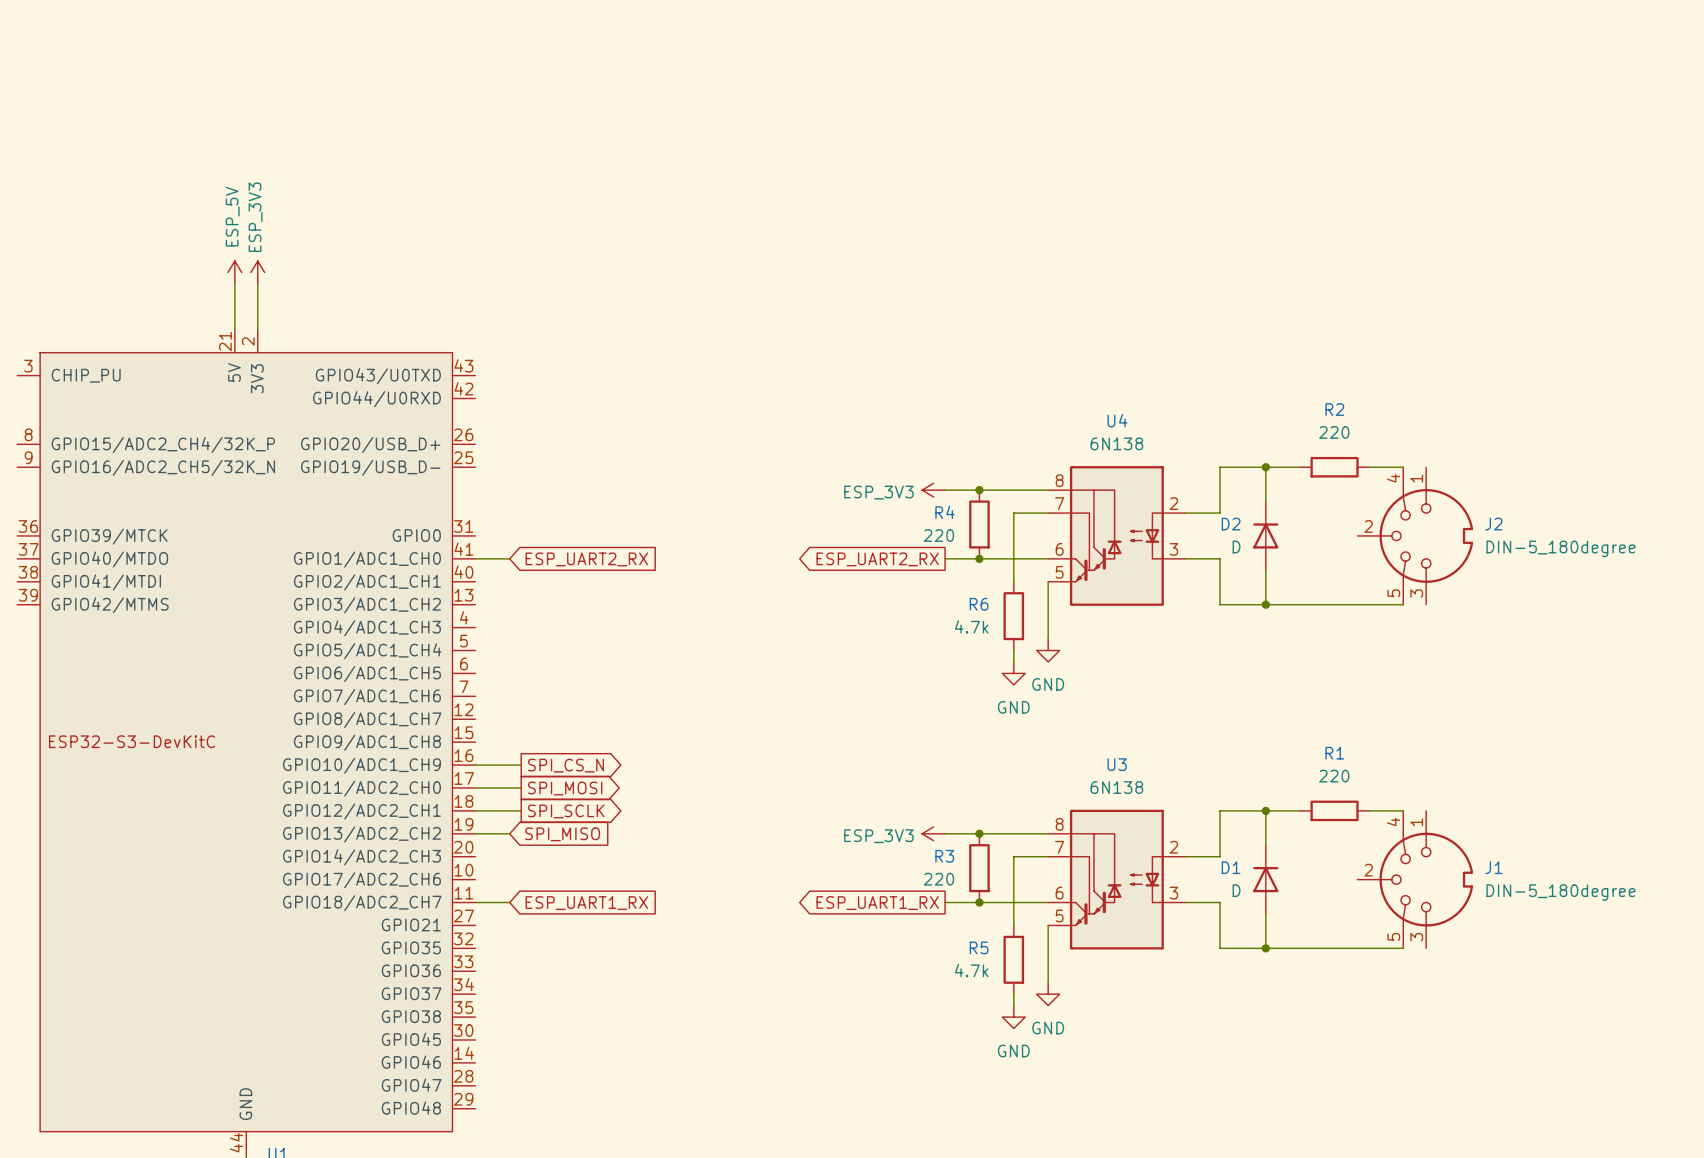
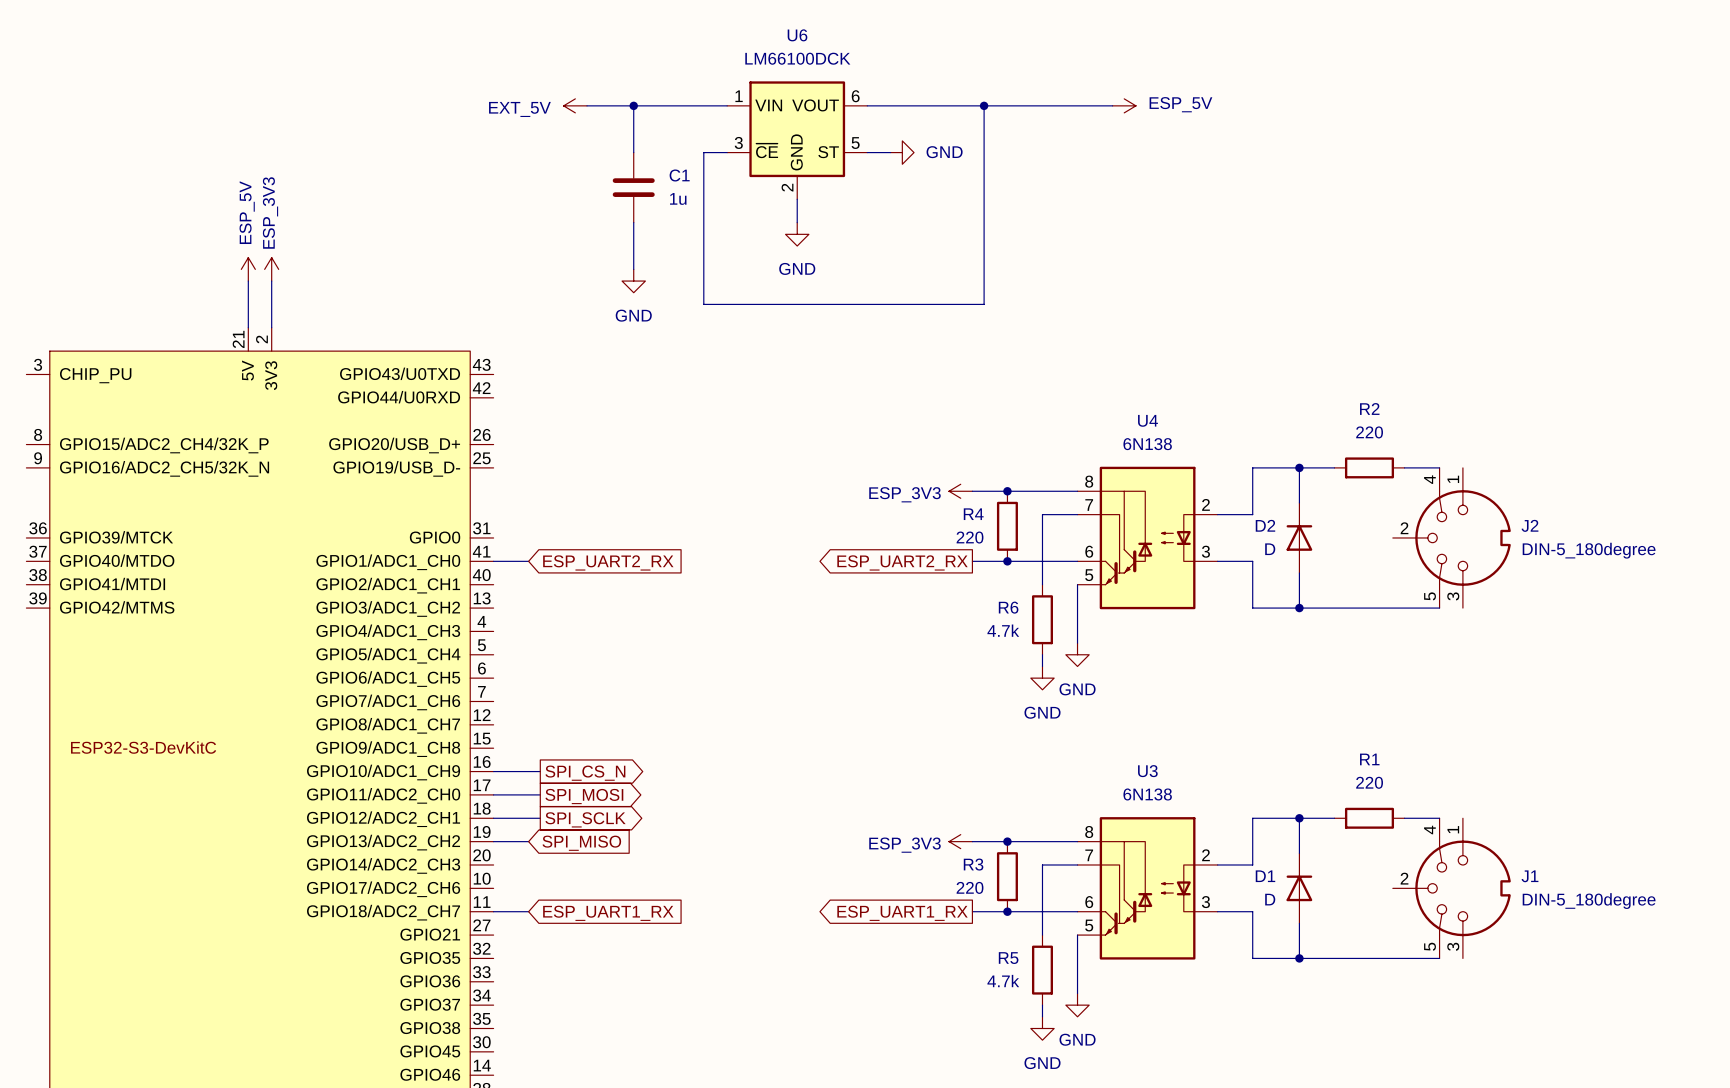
power symbol: none -> EXT_5V (575, 105)
wire: none -> (587, 105) (727, 105)
wire: none -> (633, 105) (633, 152)
junction: none -> (633, 105)
wire: none -> (867, 105) (1112, 105)
wire: none -> (984, 105) (984, 304) (703, 304) (703, 152) (727, 152)
junction: none -> (984, 105)
power symbol: none -> ESP_5V (1124, 105)
U6: none -> LM66100DCK (797, 140)
wire: none -> (867, 152) (890, 152)
power symbol: none -> GND (902, 152)
C1: none -> 1u (633, 187)
wire: none -> (797, 199) (797, 222)
wire: none -> (633, 222) (633, 269)
power symbol: none -> GND (797, 234)
power symbol: none -> GND (633, 281)

